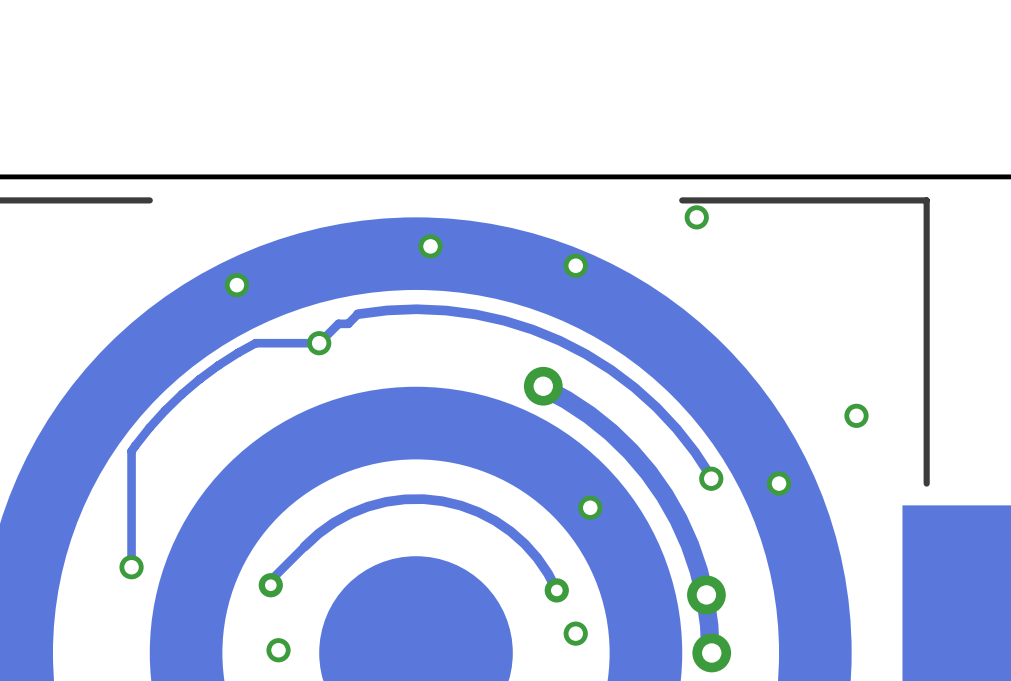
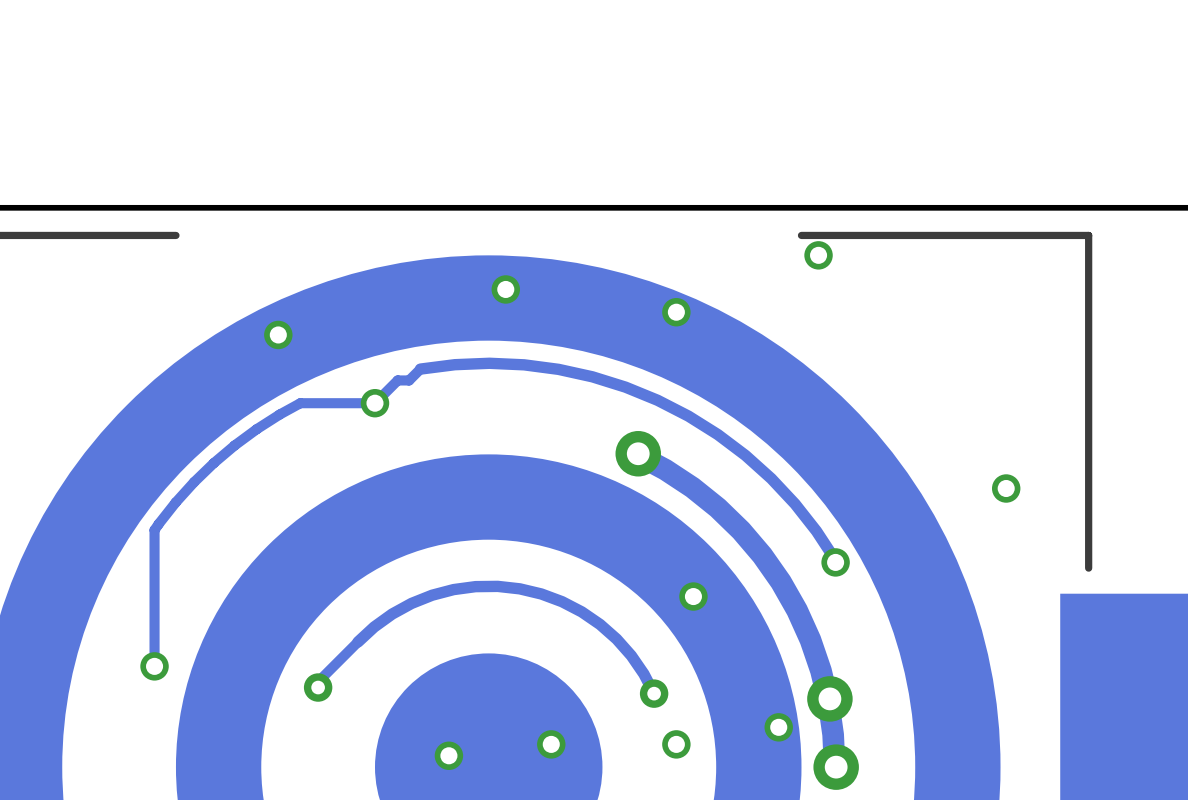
via: (779, 483) -> none
via: none -> (778, 727)
via: none -> (551, 744)
via: none -> (448, 755)
via: (278, 650) -> none

